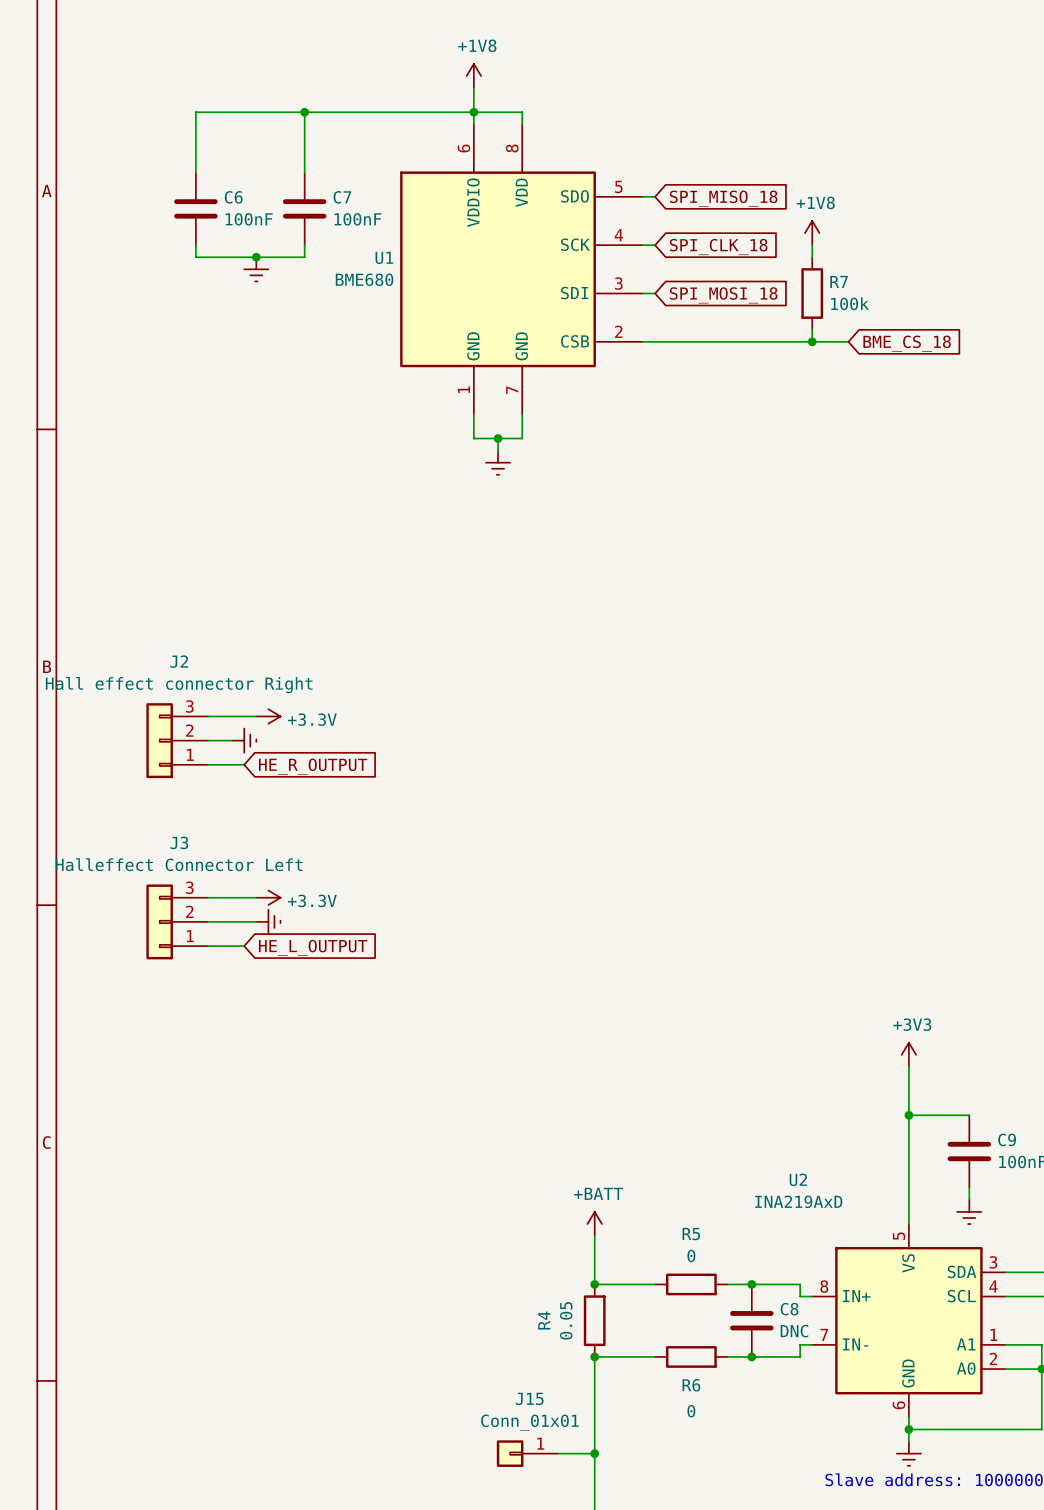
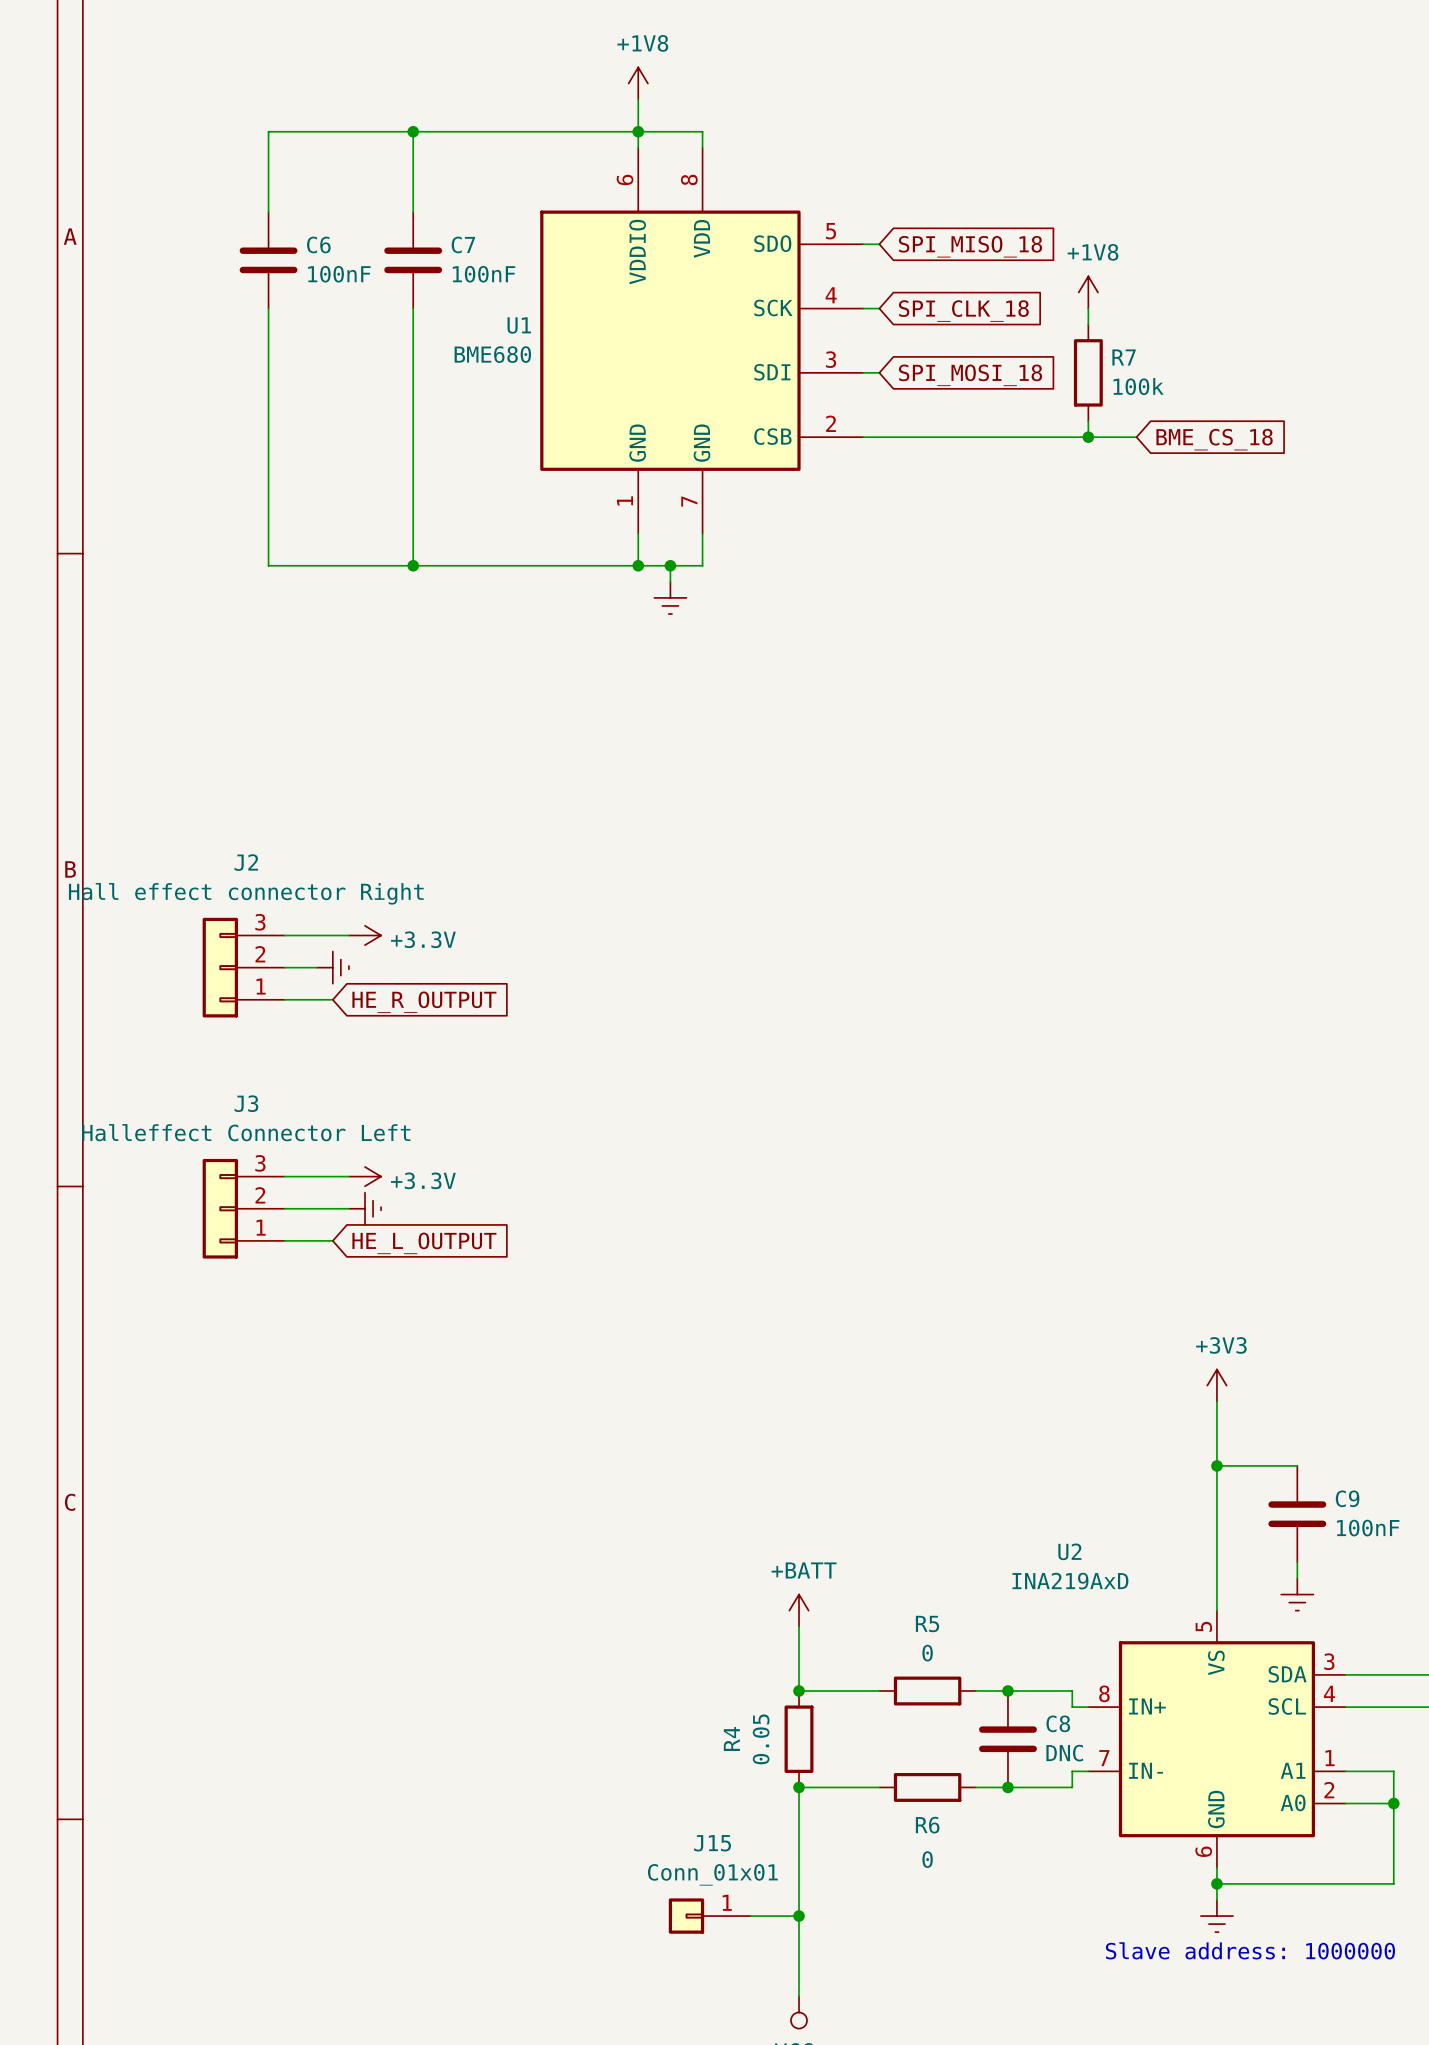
wire: (195, 257) (304, 257) -> (413, 565) (413, 324)
wire: none -> (268, 324) (268, 565) (638, 565)
junction: (256, 257) -> none
power symbol: (256, 269) -> none
junction: none -> (413, 565)
junction: none -> (638, 565)

